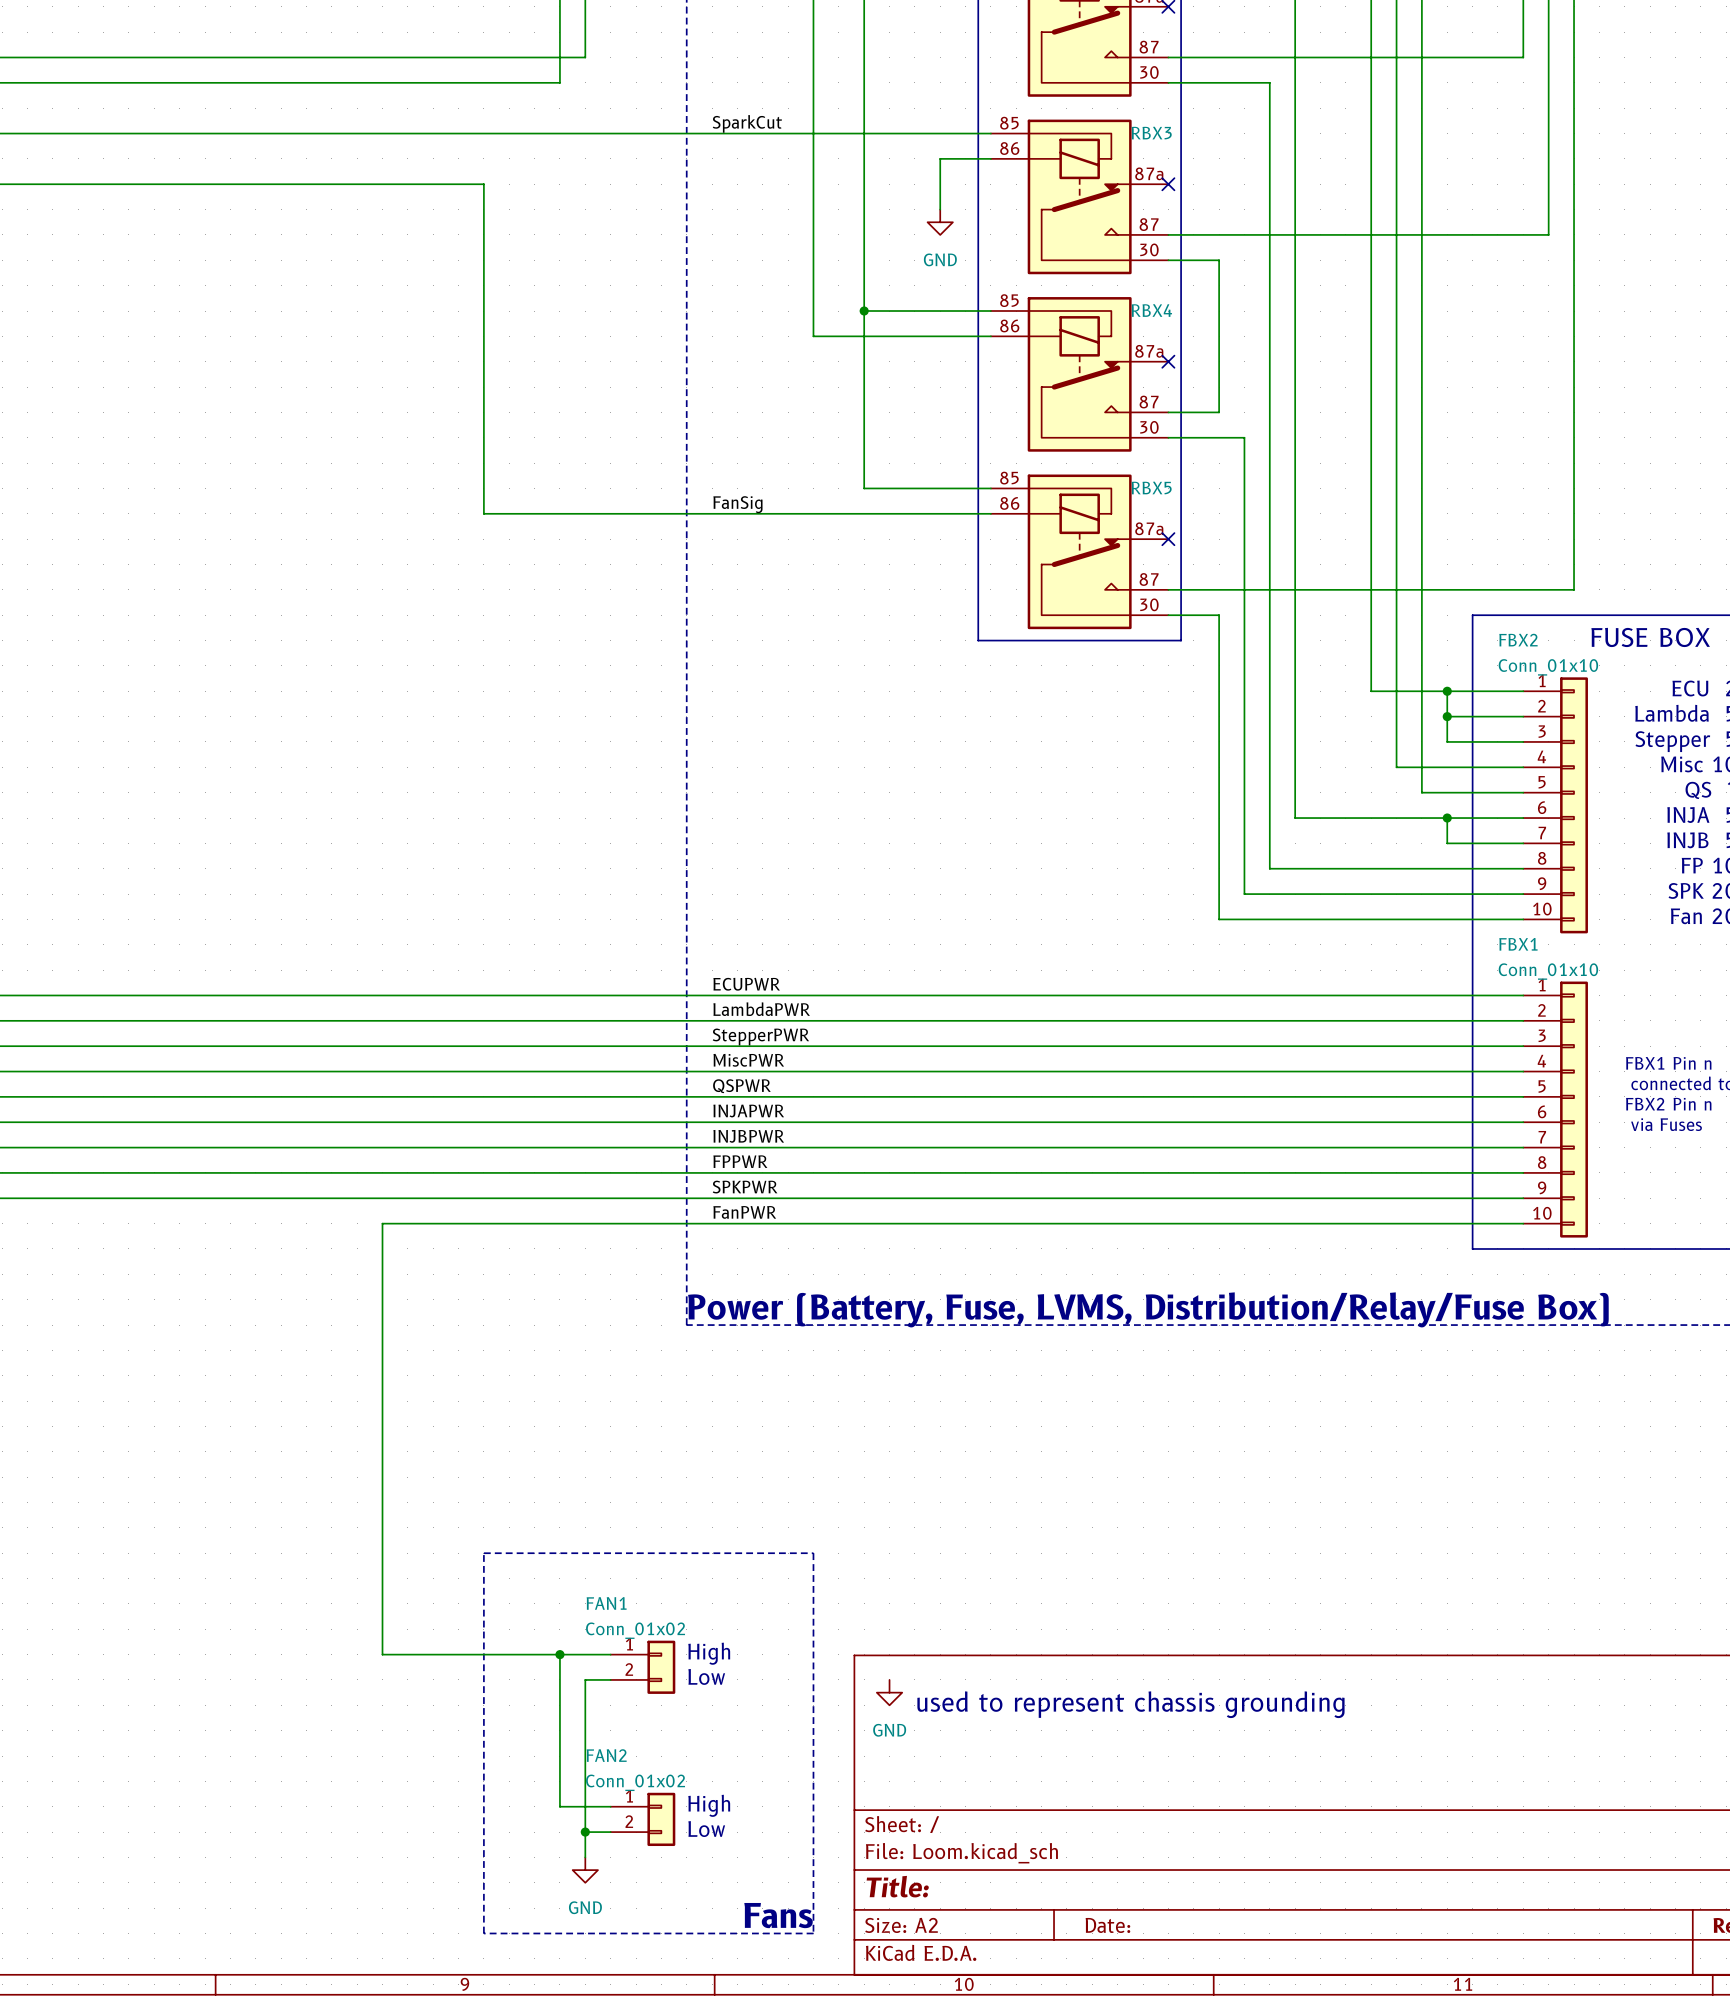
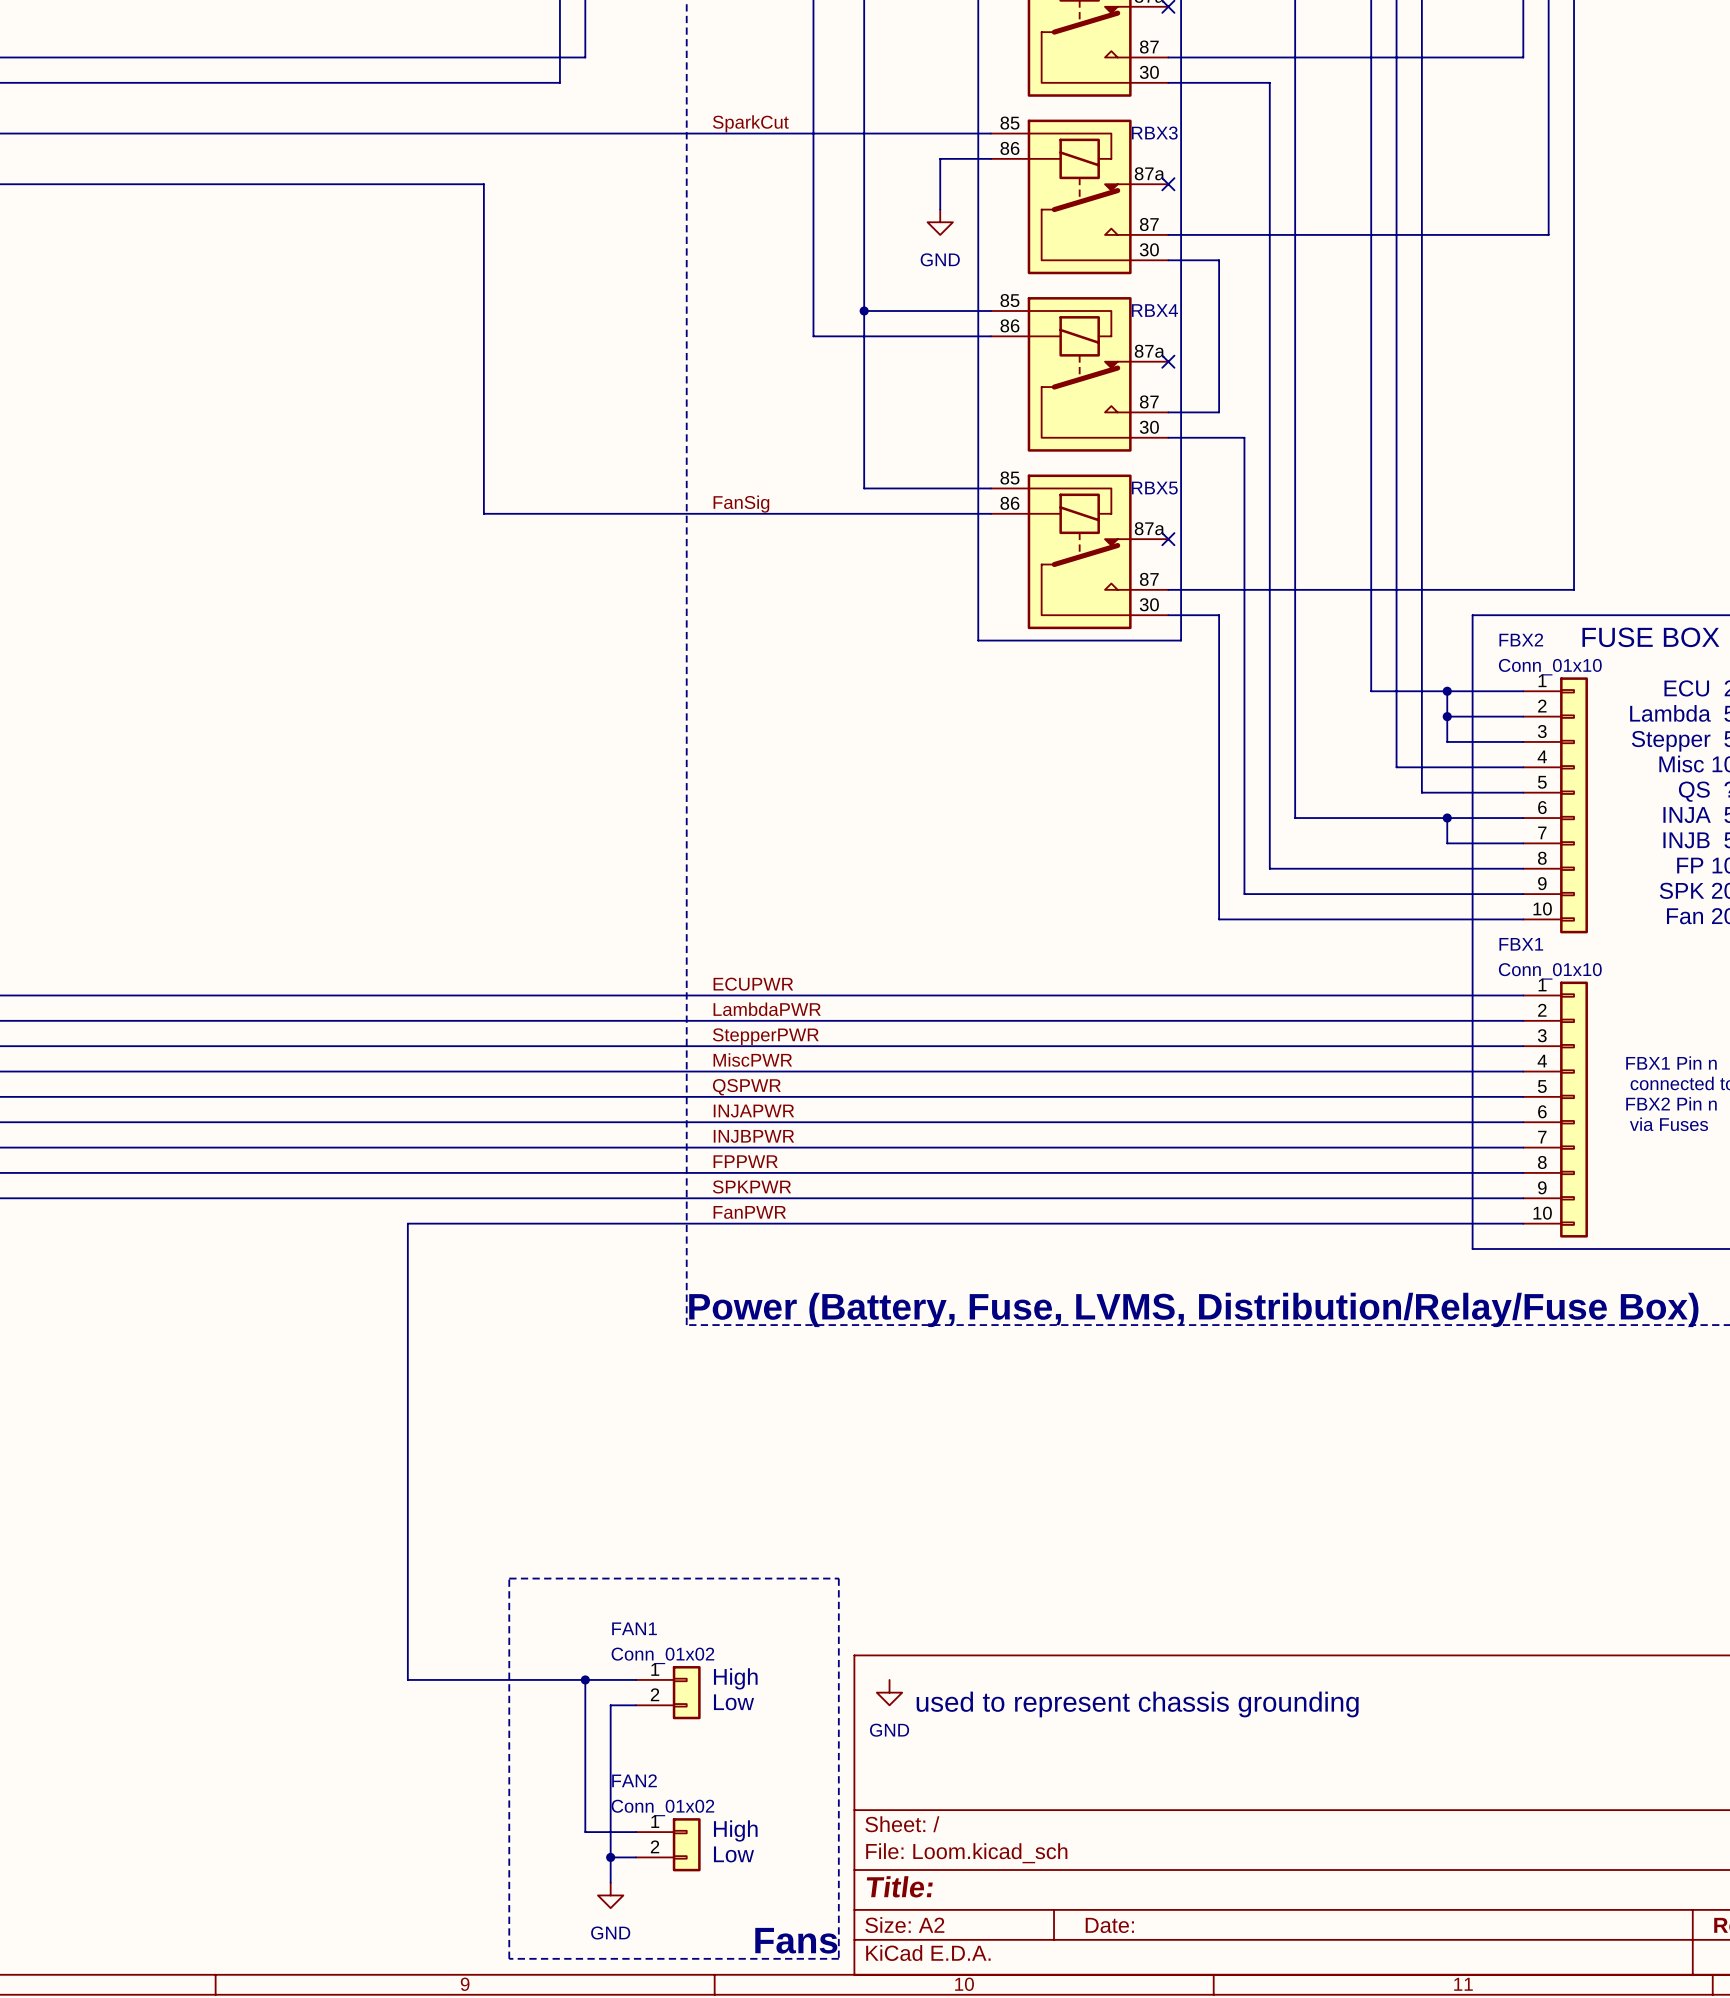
wire: (407, 1223) (382, 1223) (382, 1654) (610, 1654) -> (407, 1223) (407, 1679) (585, 1679)
line: (483, 1553) (813, 1553) (813, 1933) (483, 1933) (483, 1553) -> (509, 1578) (838, 1578) (838, 1958) (509, 1958) (509, 1578)
text position: High (709, 1653) -> High (735, 1678)
wire: (559, 1654) (559, 1806) (610, 1806) -> none
junction position: (559, 1654) -> (585, 1679)
FAN1 position: (642, 1667) -> (668, 1692)
text position: Low (706, 1676) -> Low (733, 1702)
wire: none -> (636, 1705) (610, 1705) (610, 1882)
text position: High (709, 1805) -> High (735, 1830)
FAN2 position: (642, 1819) -> (668, 1844)
text position: Low (706, 1829) -> Low (733, 1854)
wire: (585, 1832) (585, 1857) -> none
junction position: (585, 1832) -> (610, 1857)
wire: none -> (610, 1857) (636, 1857)
power symbol position: GND (585, 1870) -> GND (610, 1895)
text position: Fans (778, 1915) -> Fans (796, 1940)

